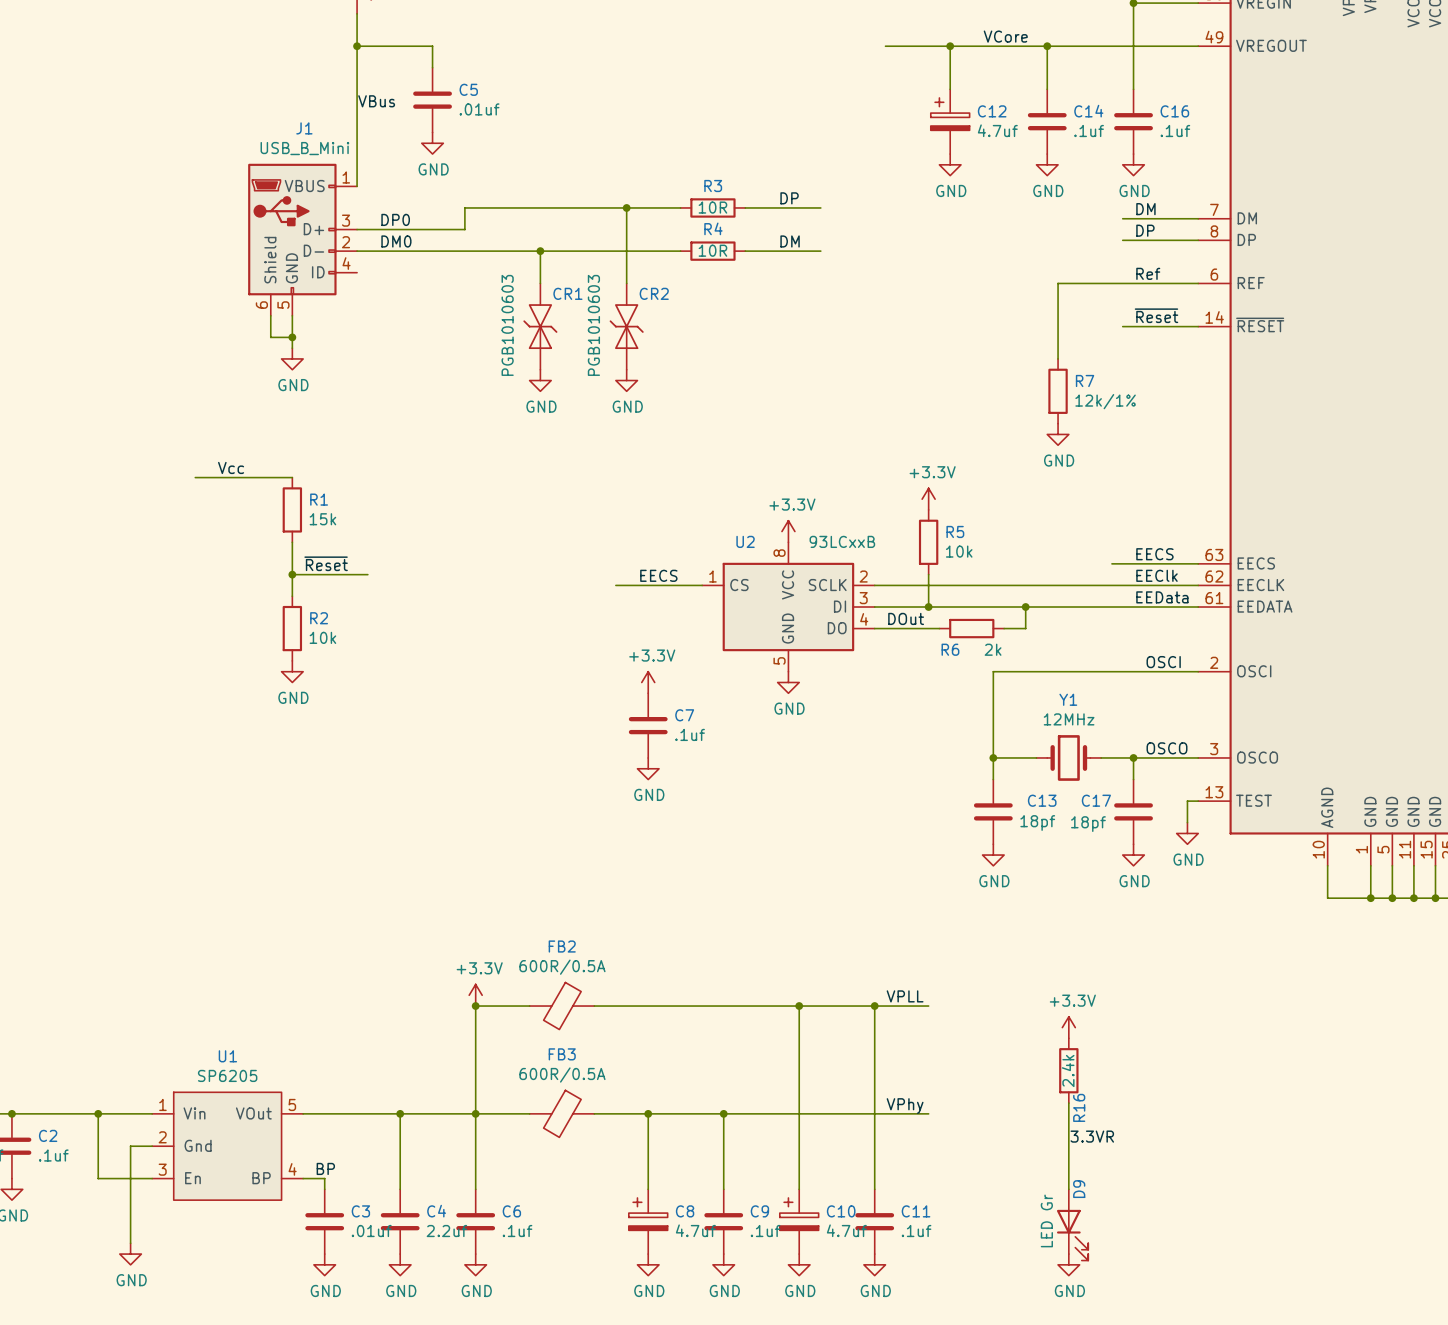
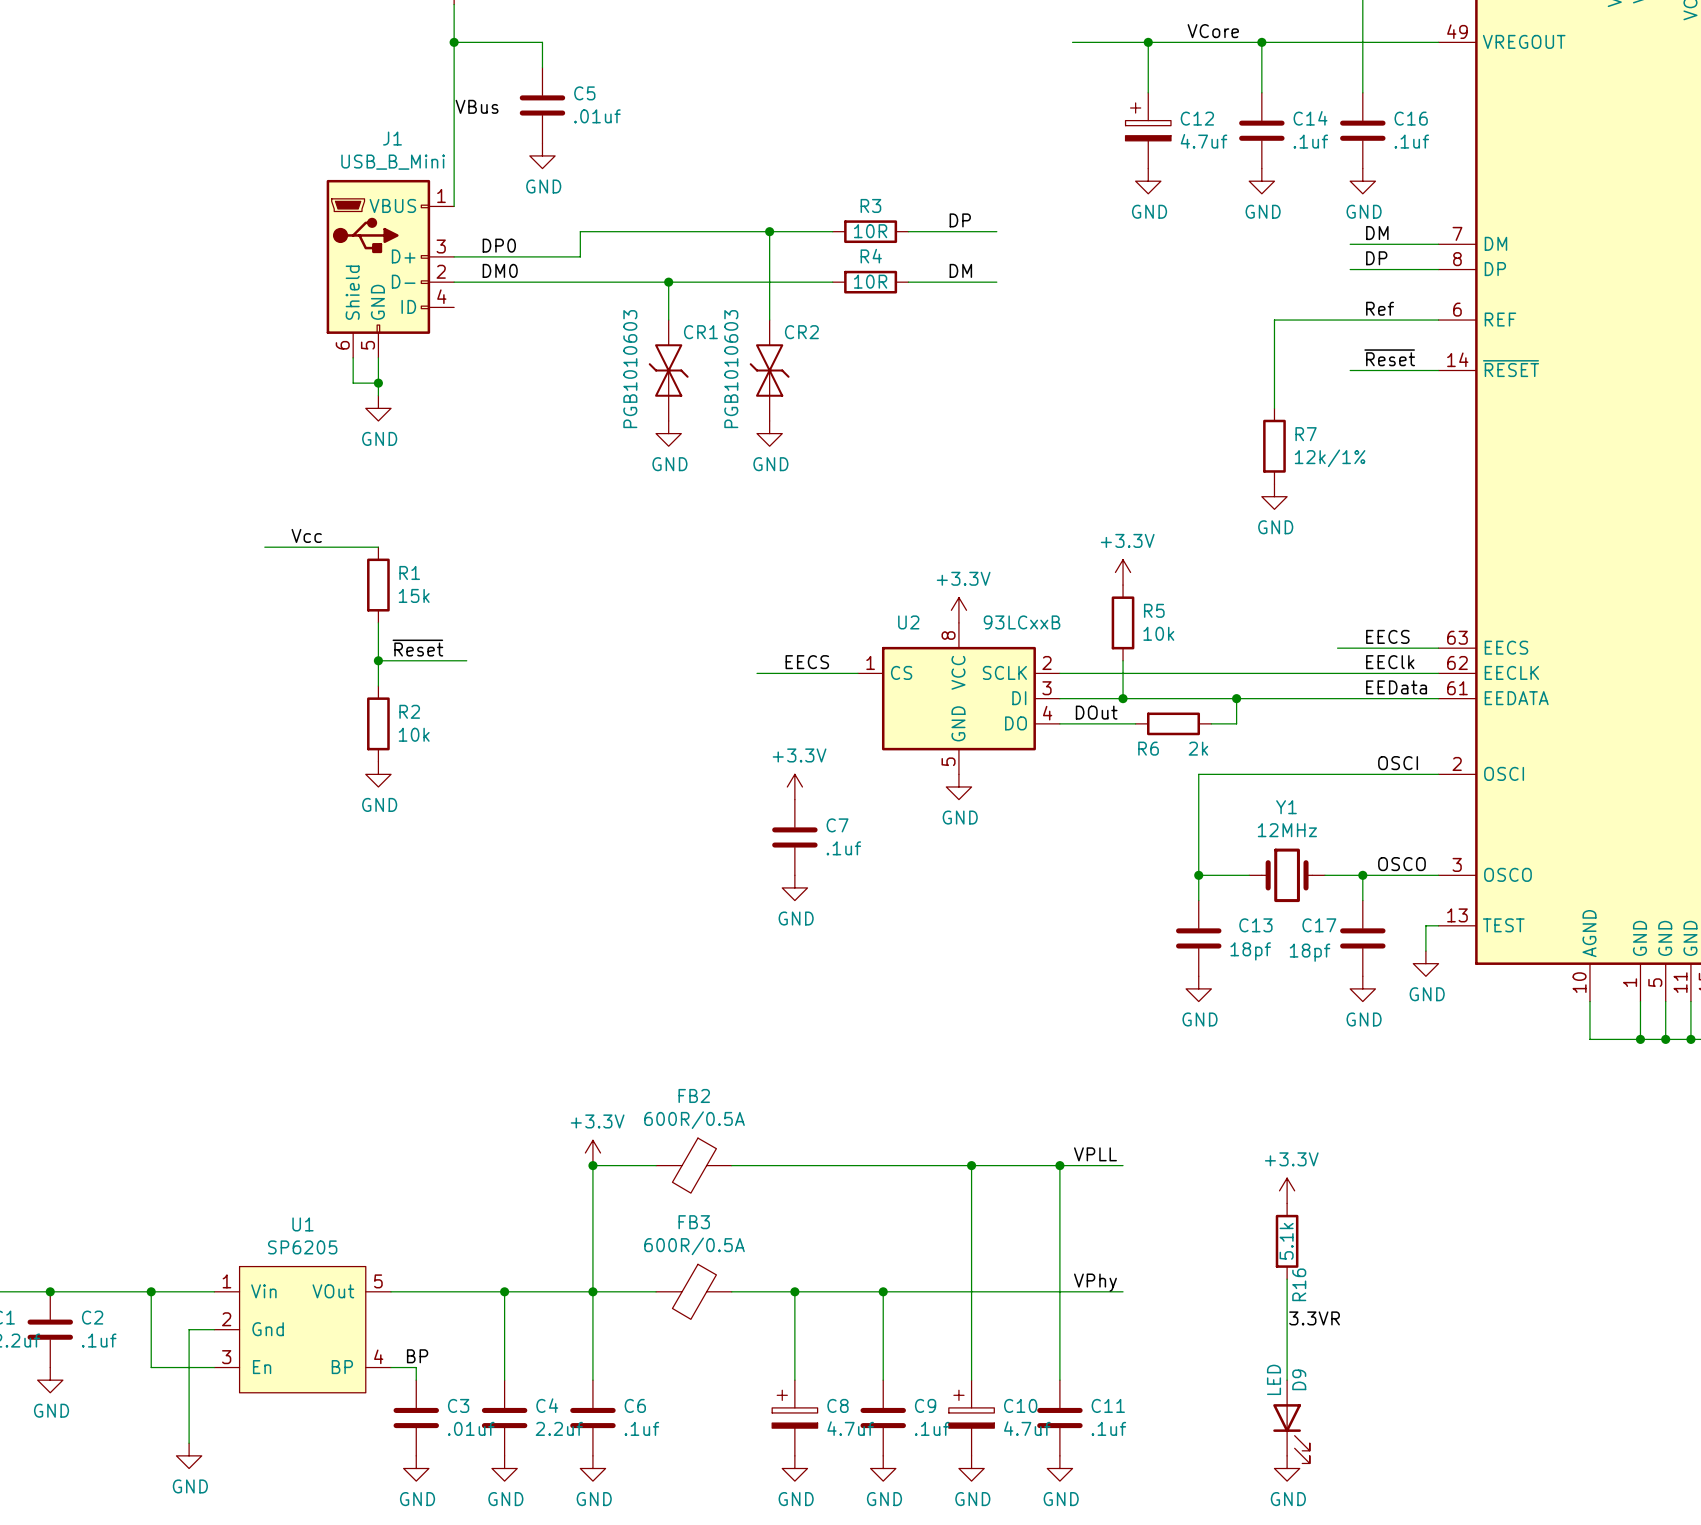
R16 value: 2.4k (1068, 1070) -> 5.1k (1286, 1241)
D9 value: LED Gr (1046, 1220) -> LED (1274, 1379)

